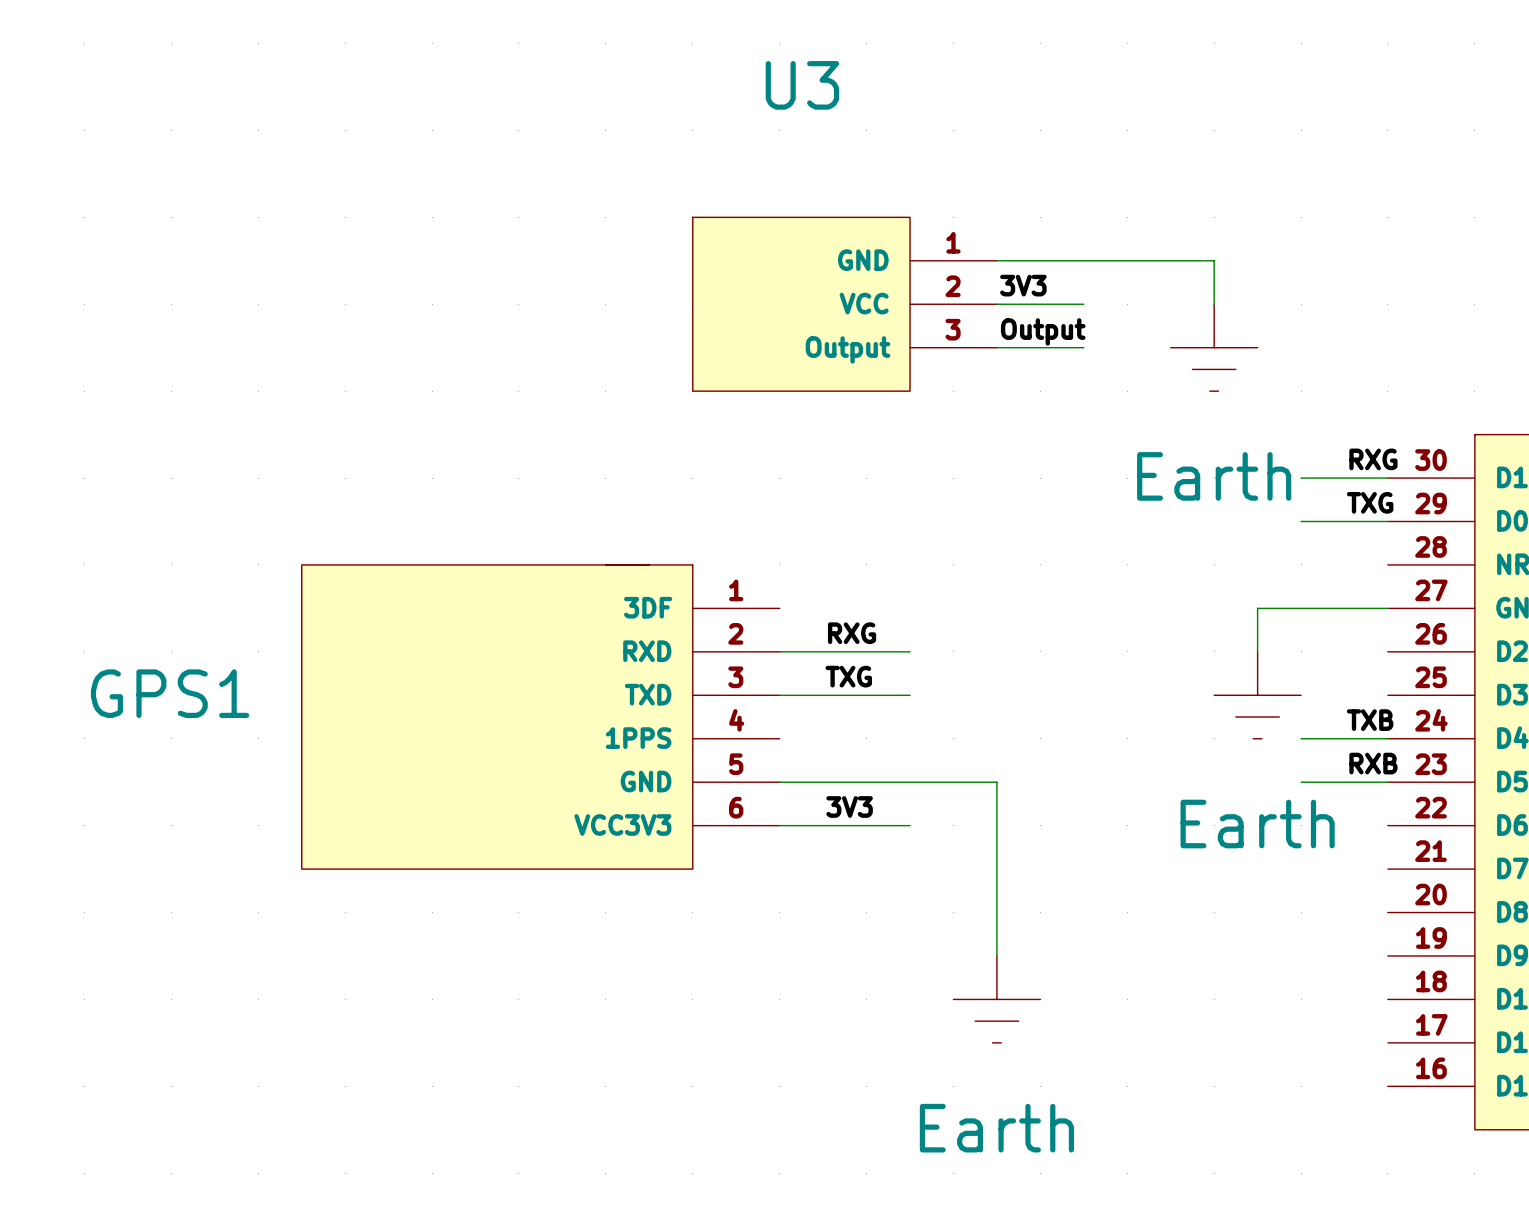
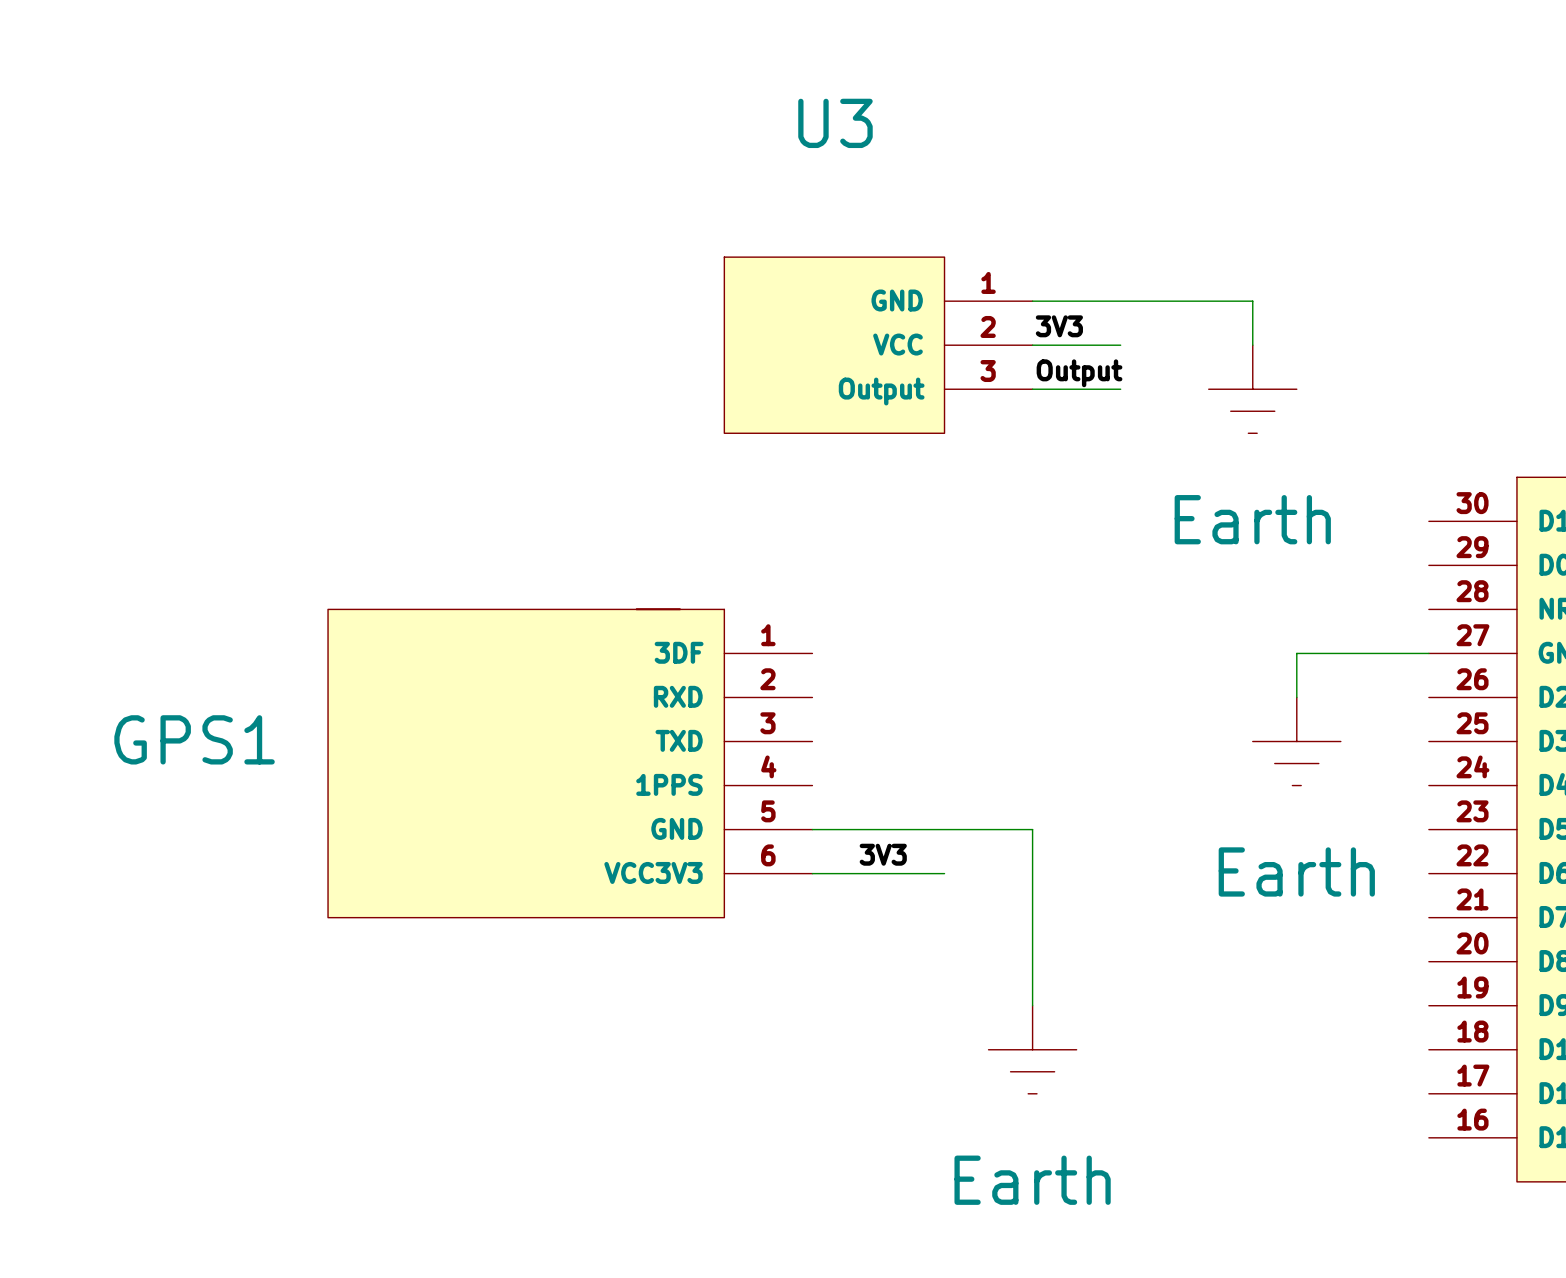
label: RXG (1373, 459) -> none
wire: (1301, 478) (1387, 478) -> none
label: TXG (1370, 502) -> none
wire: (1301, 521) (1387, 521) -> none
label: RXG (852, 633) -> none
wire: (779, 651) (910, 651) -> none
label: TXG (848, 676) -> none
wire: (779, 695) (910, 695) -> none
label: TXB (1370, 720) -> none
wire: (1301, 738) (1387, 738) -> none
label: RXB (1373, 763) -> none
wire: (1301, 782) (1387, 782) -> none

